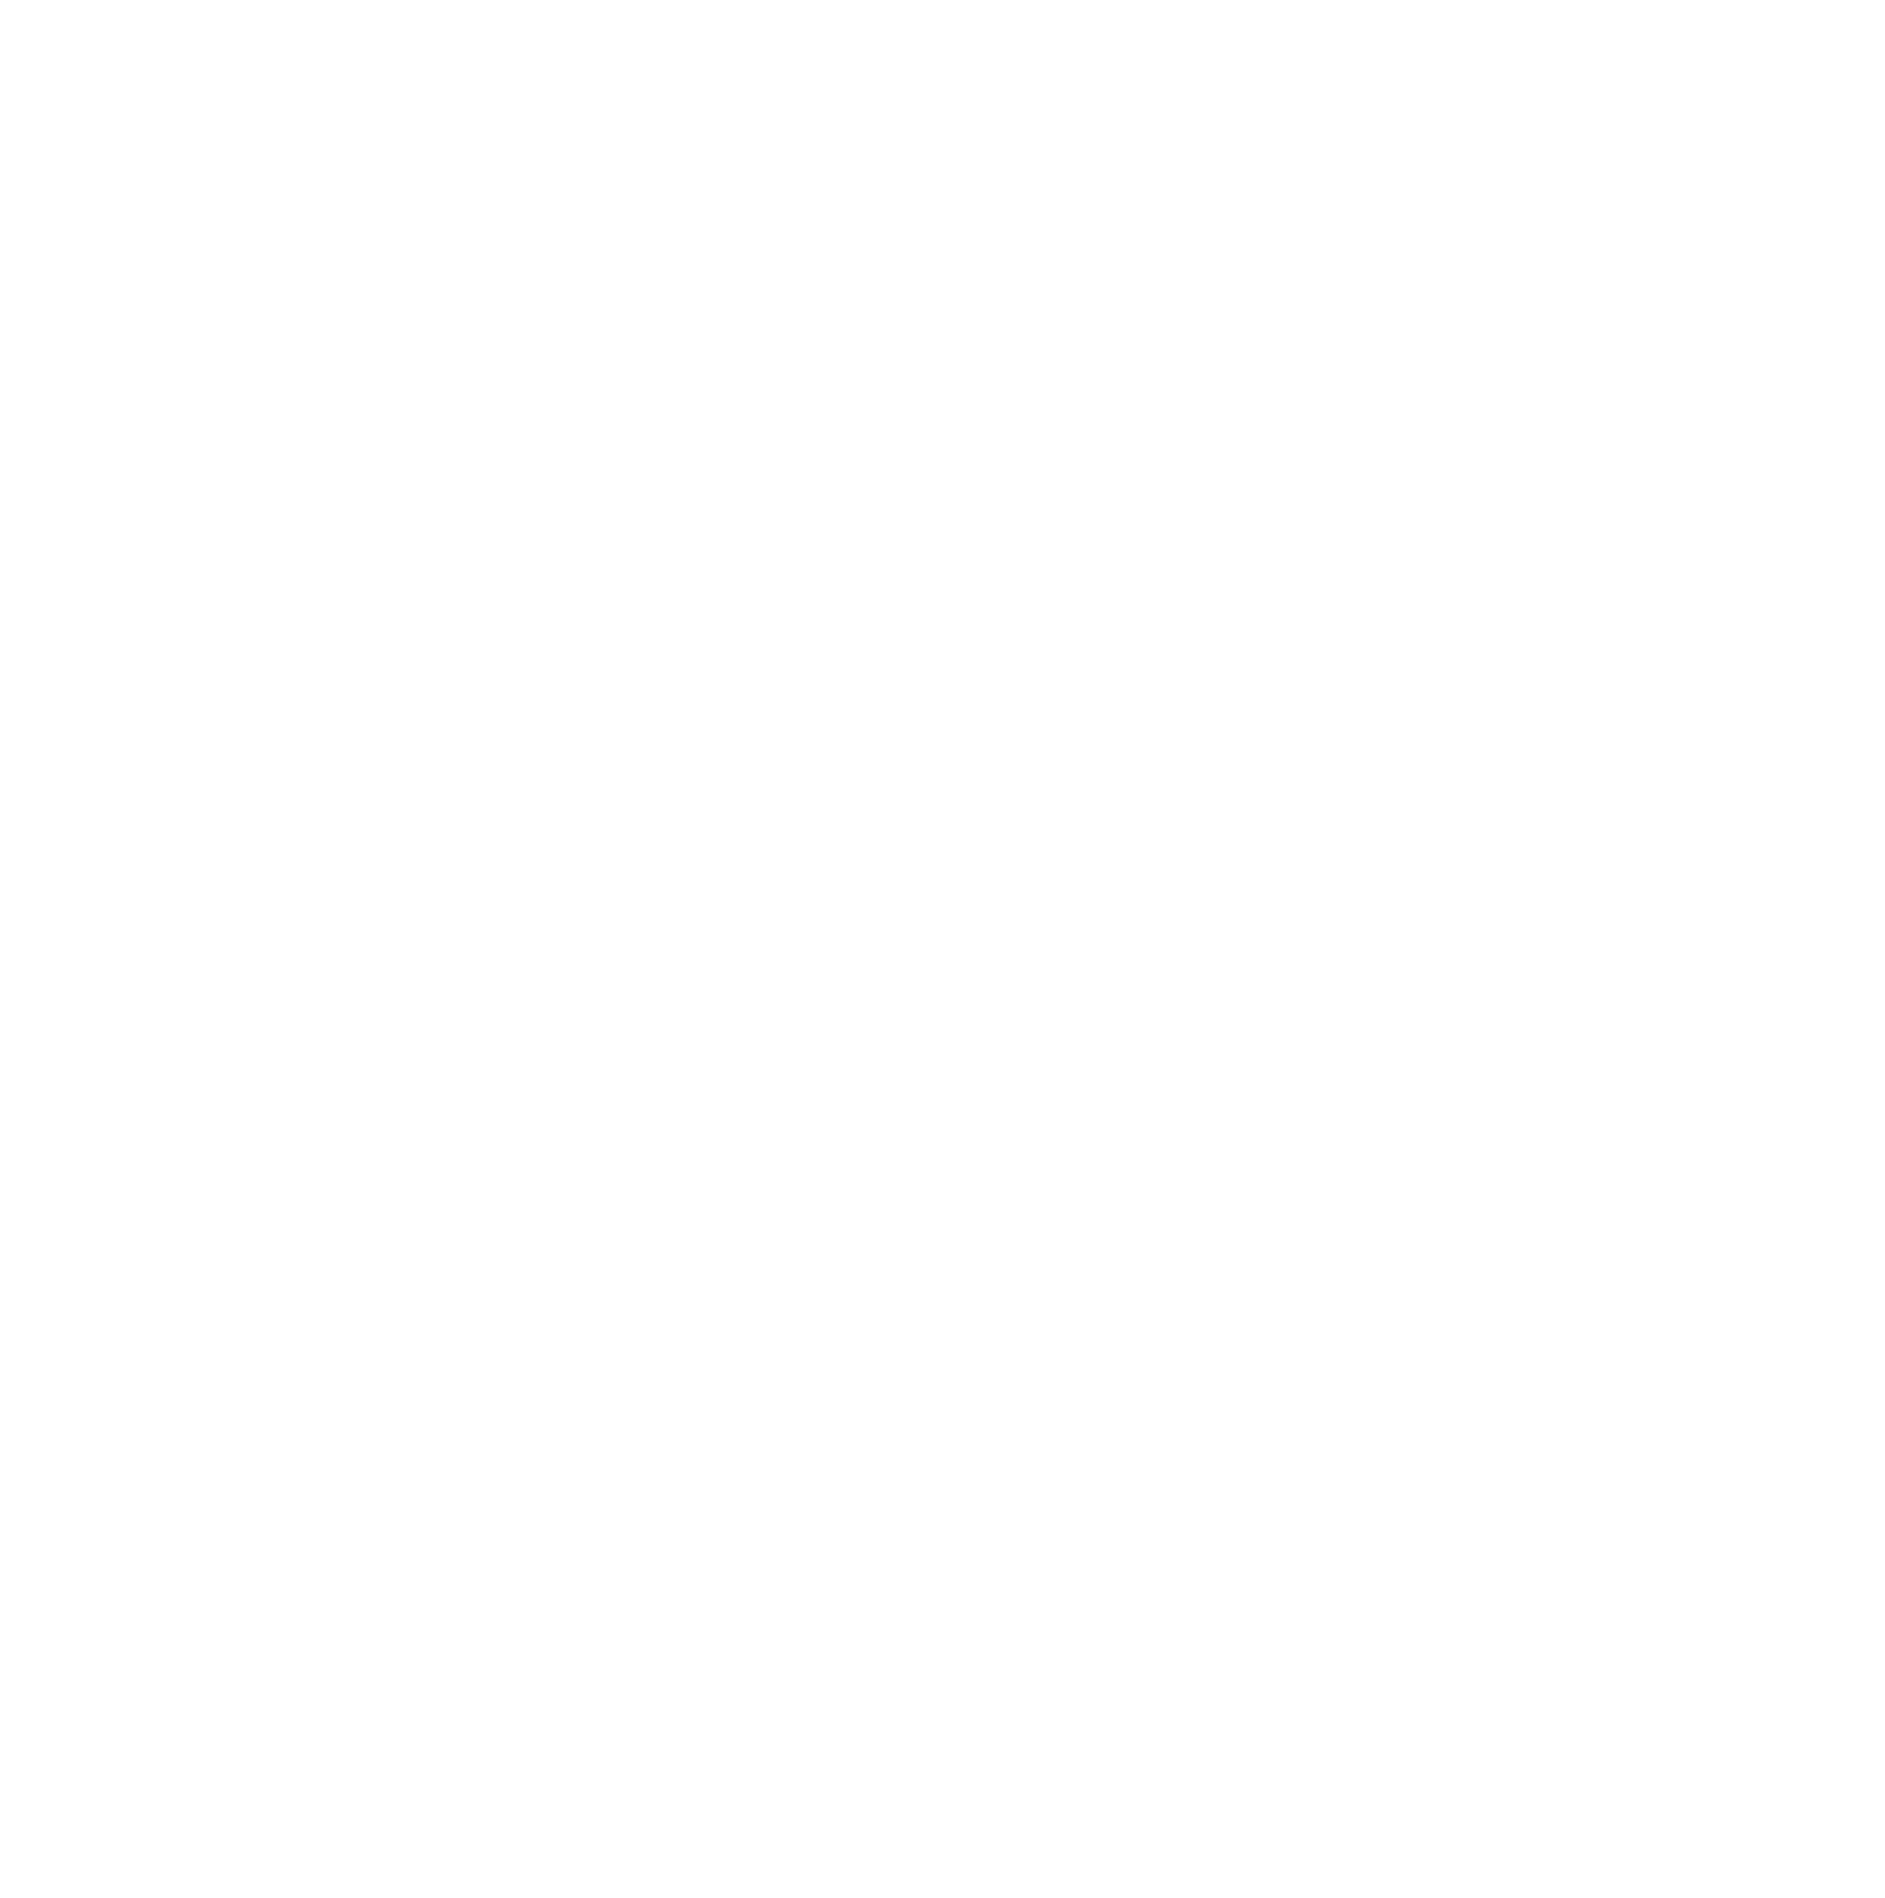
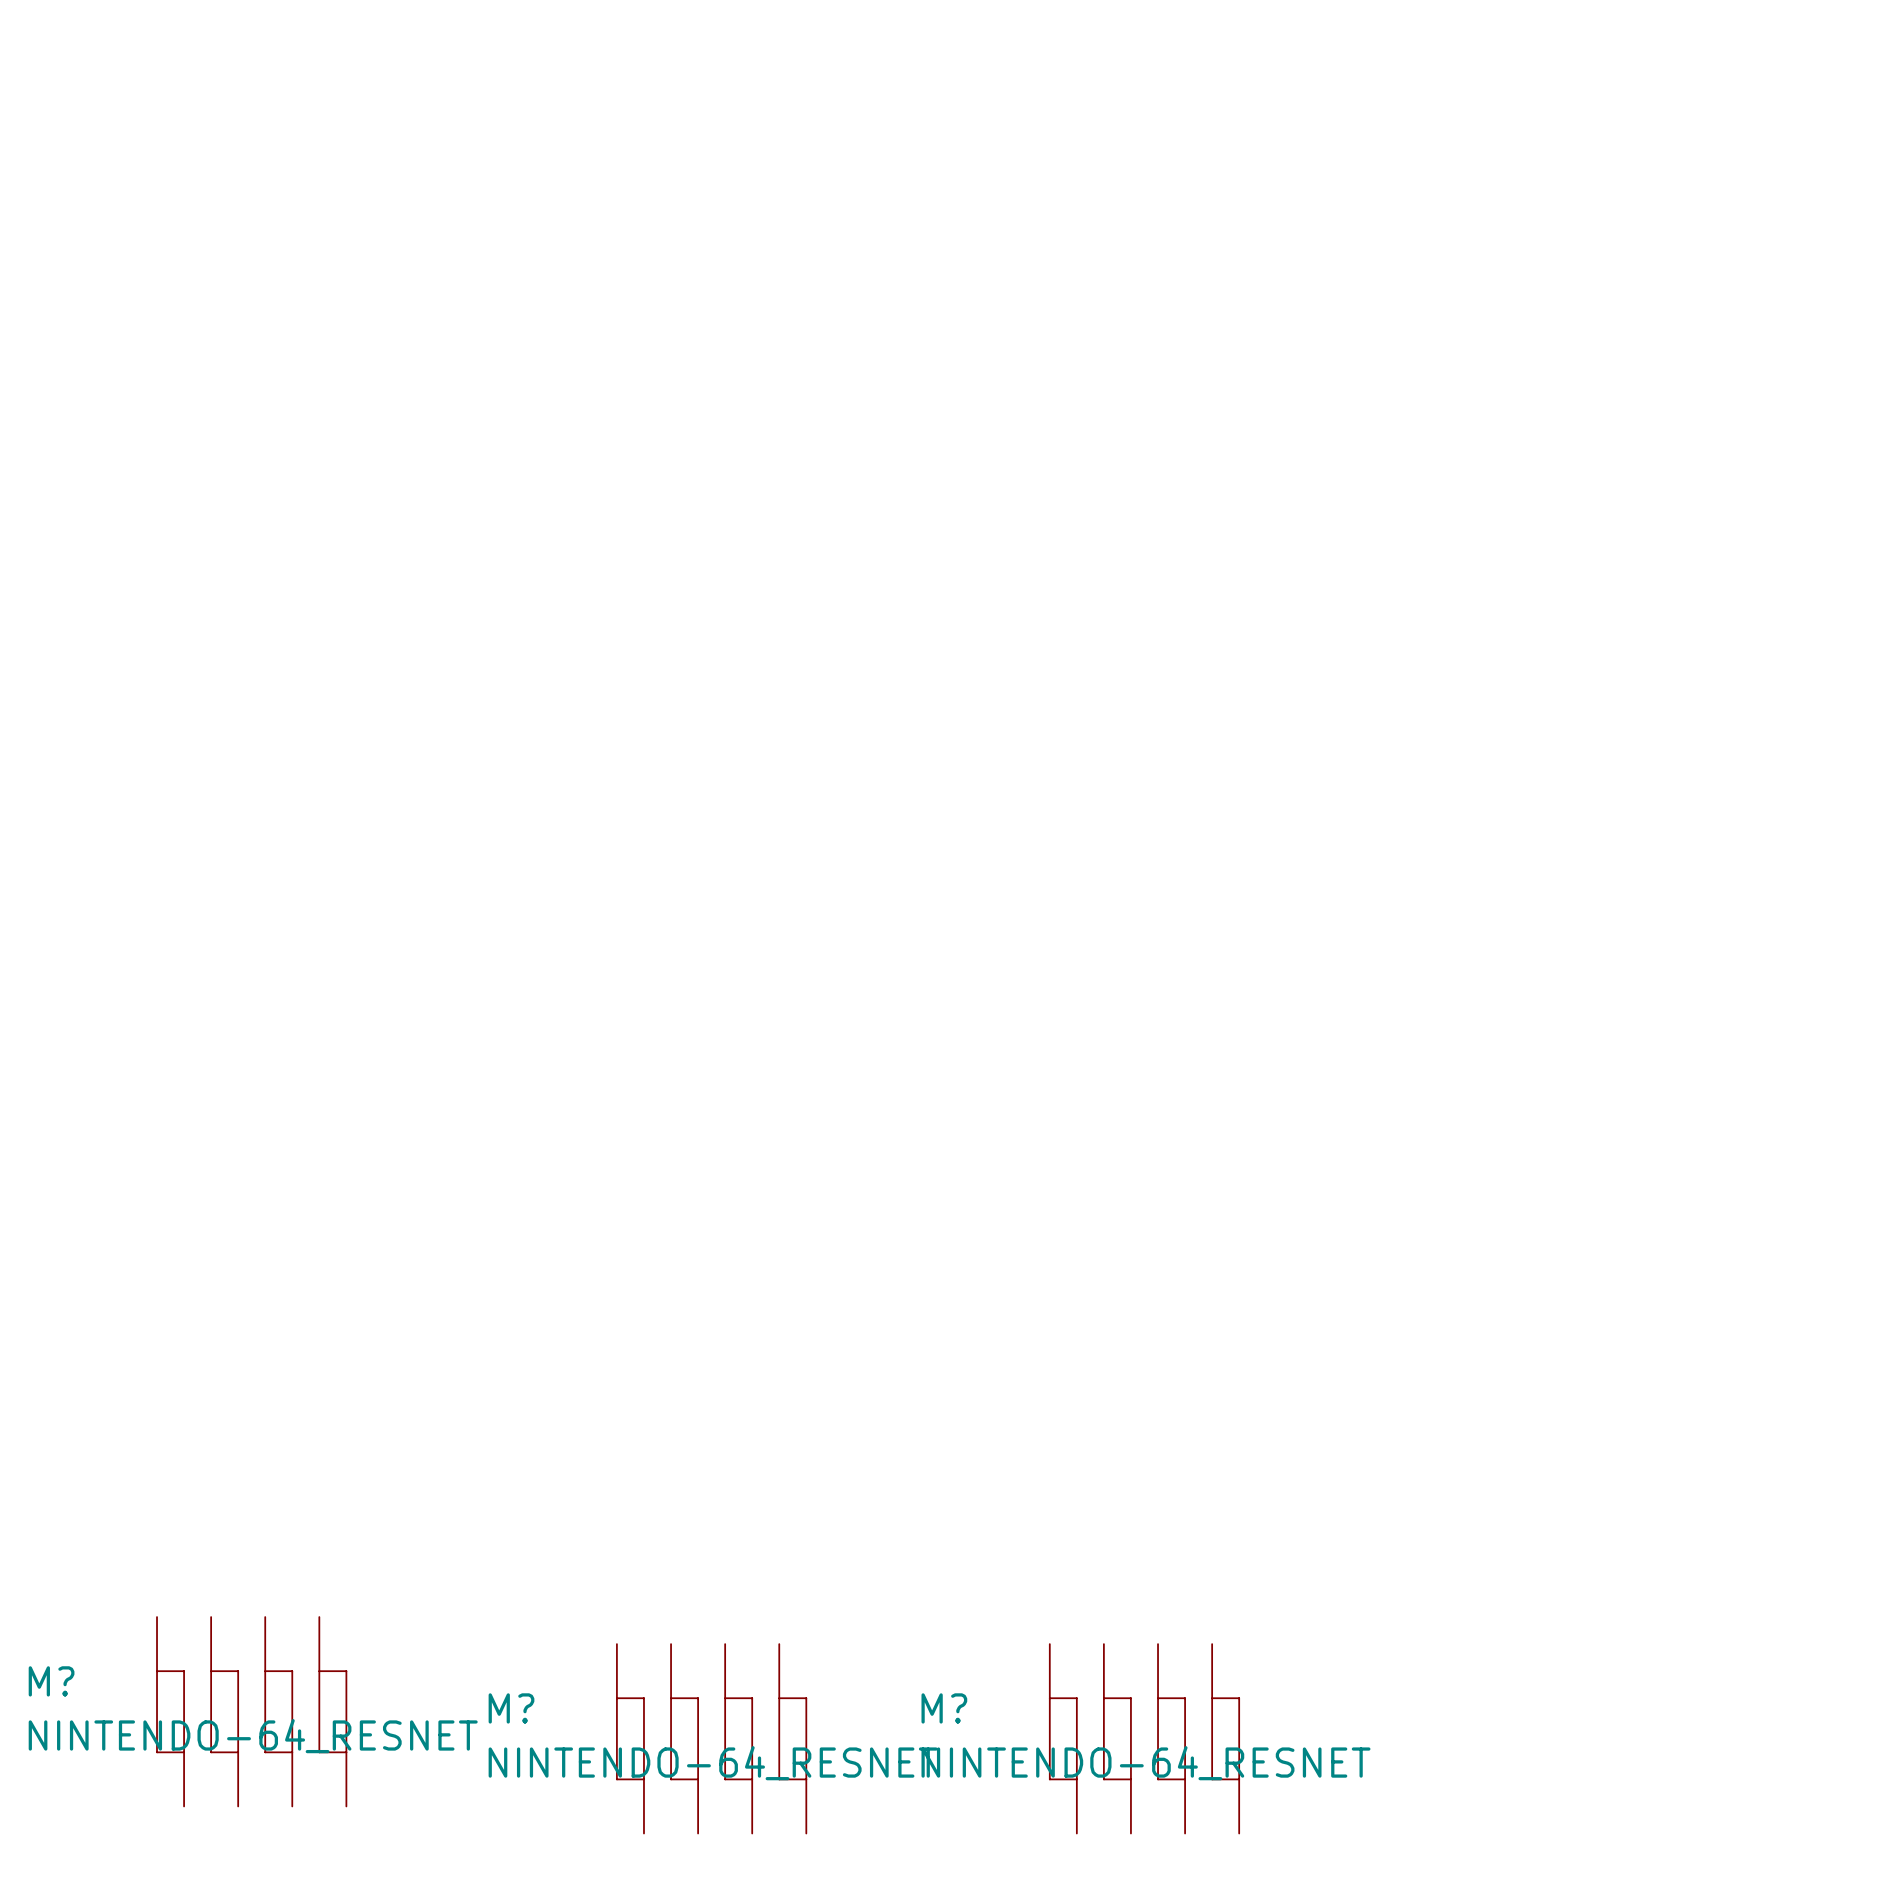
M?: none -> NINTENDO-64_RESNET (251, 1711)
M?: none -> NINTENDO-64_RESNET (711, 1738)
M?: none -> NINTENDO-64_RESNET (1144, 1738)

